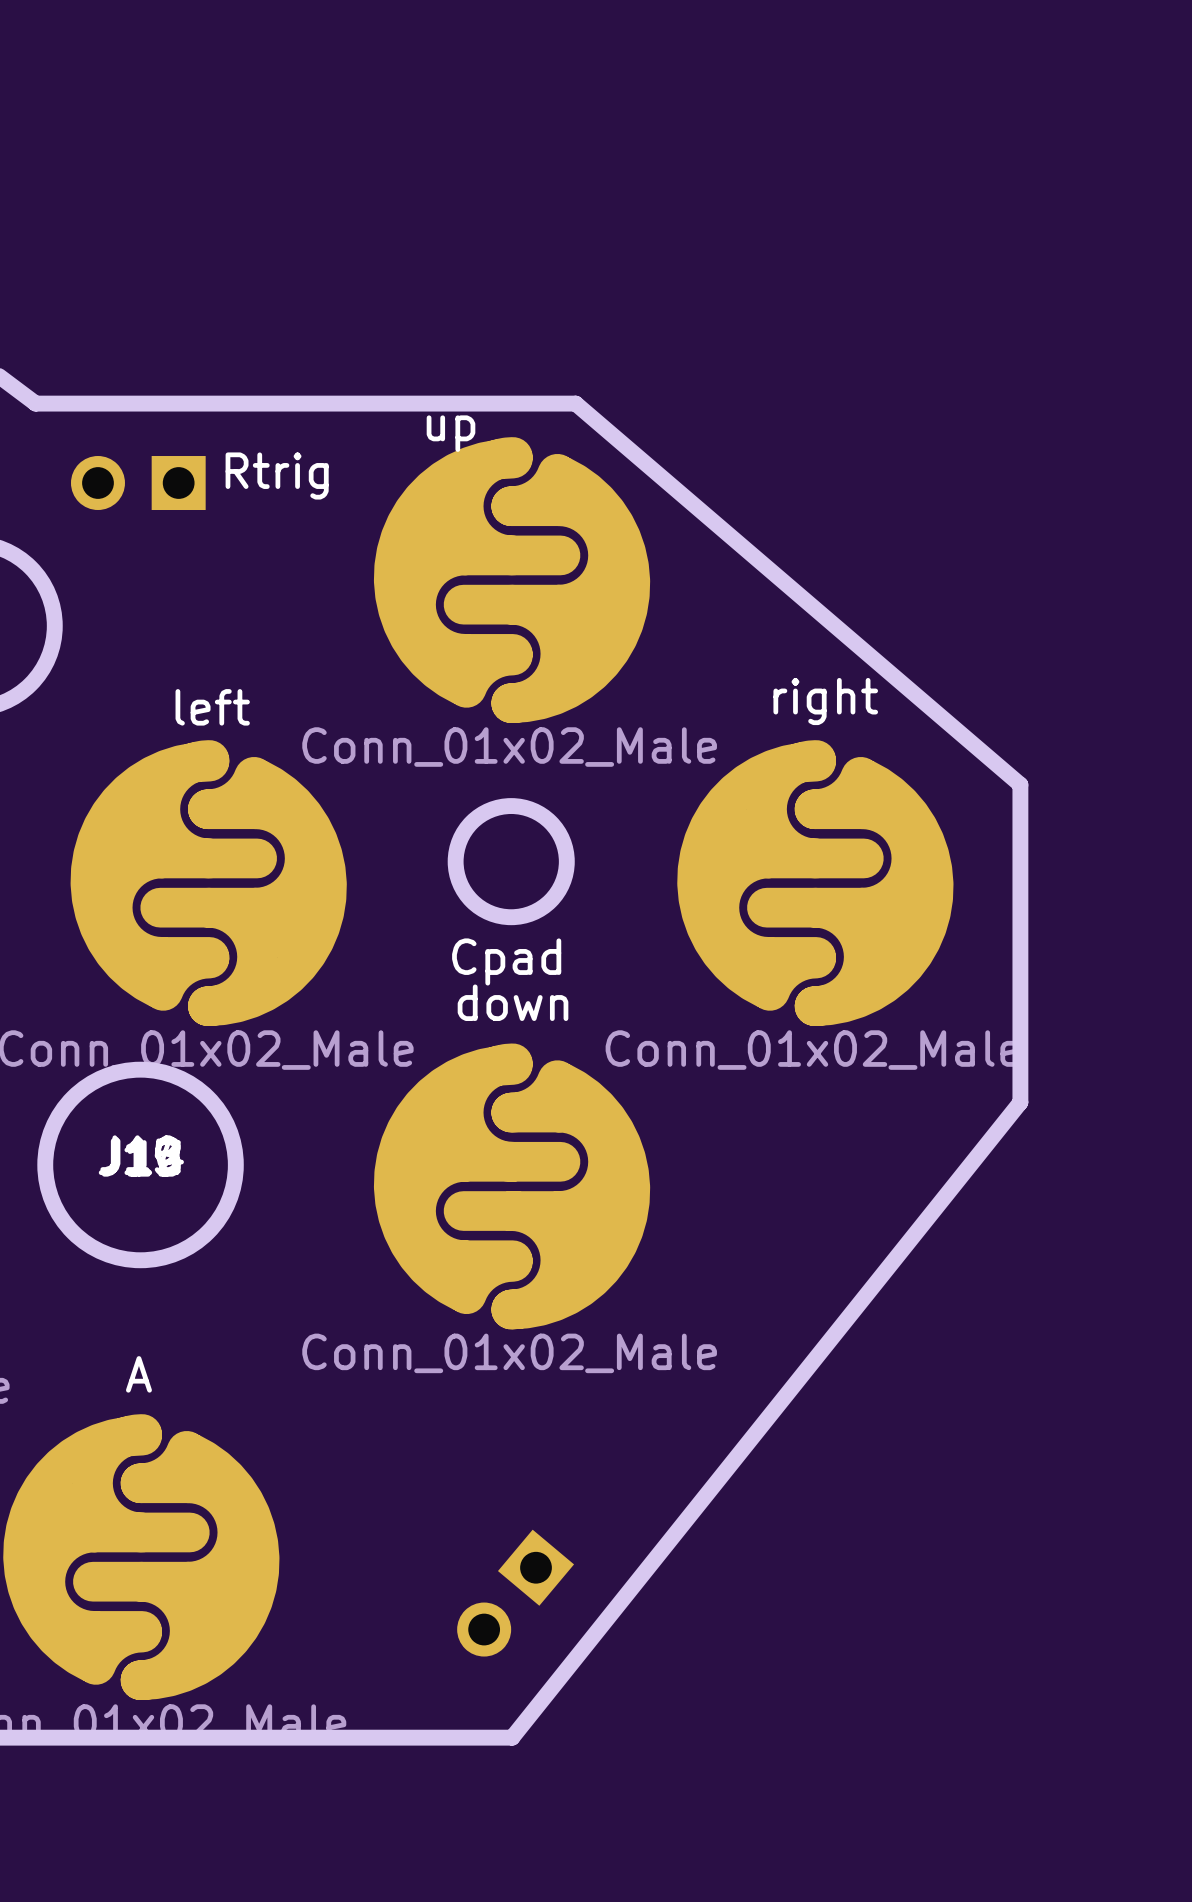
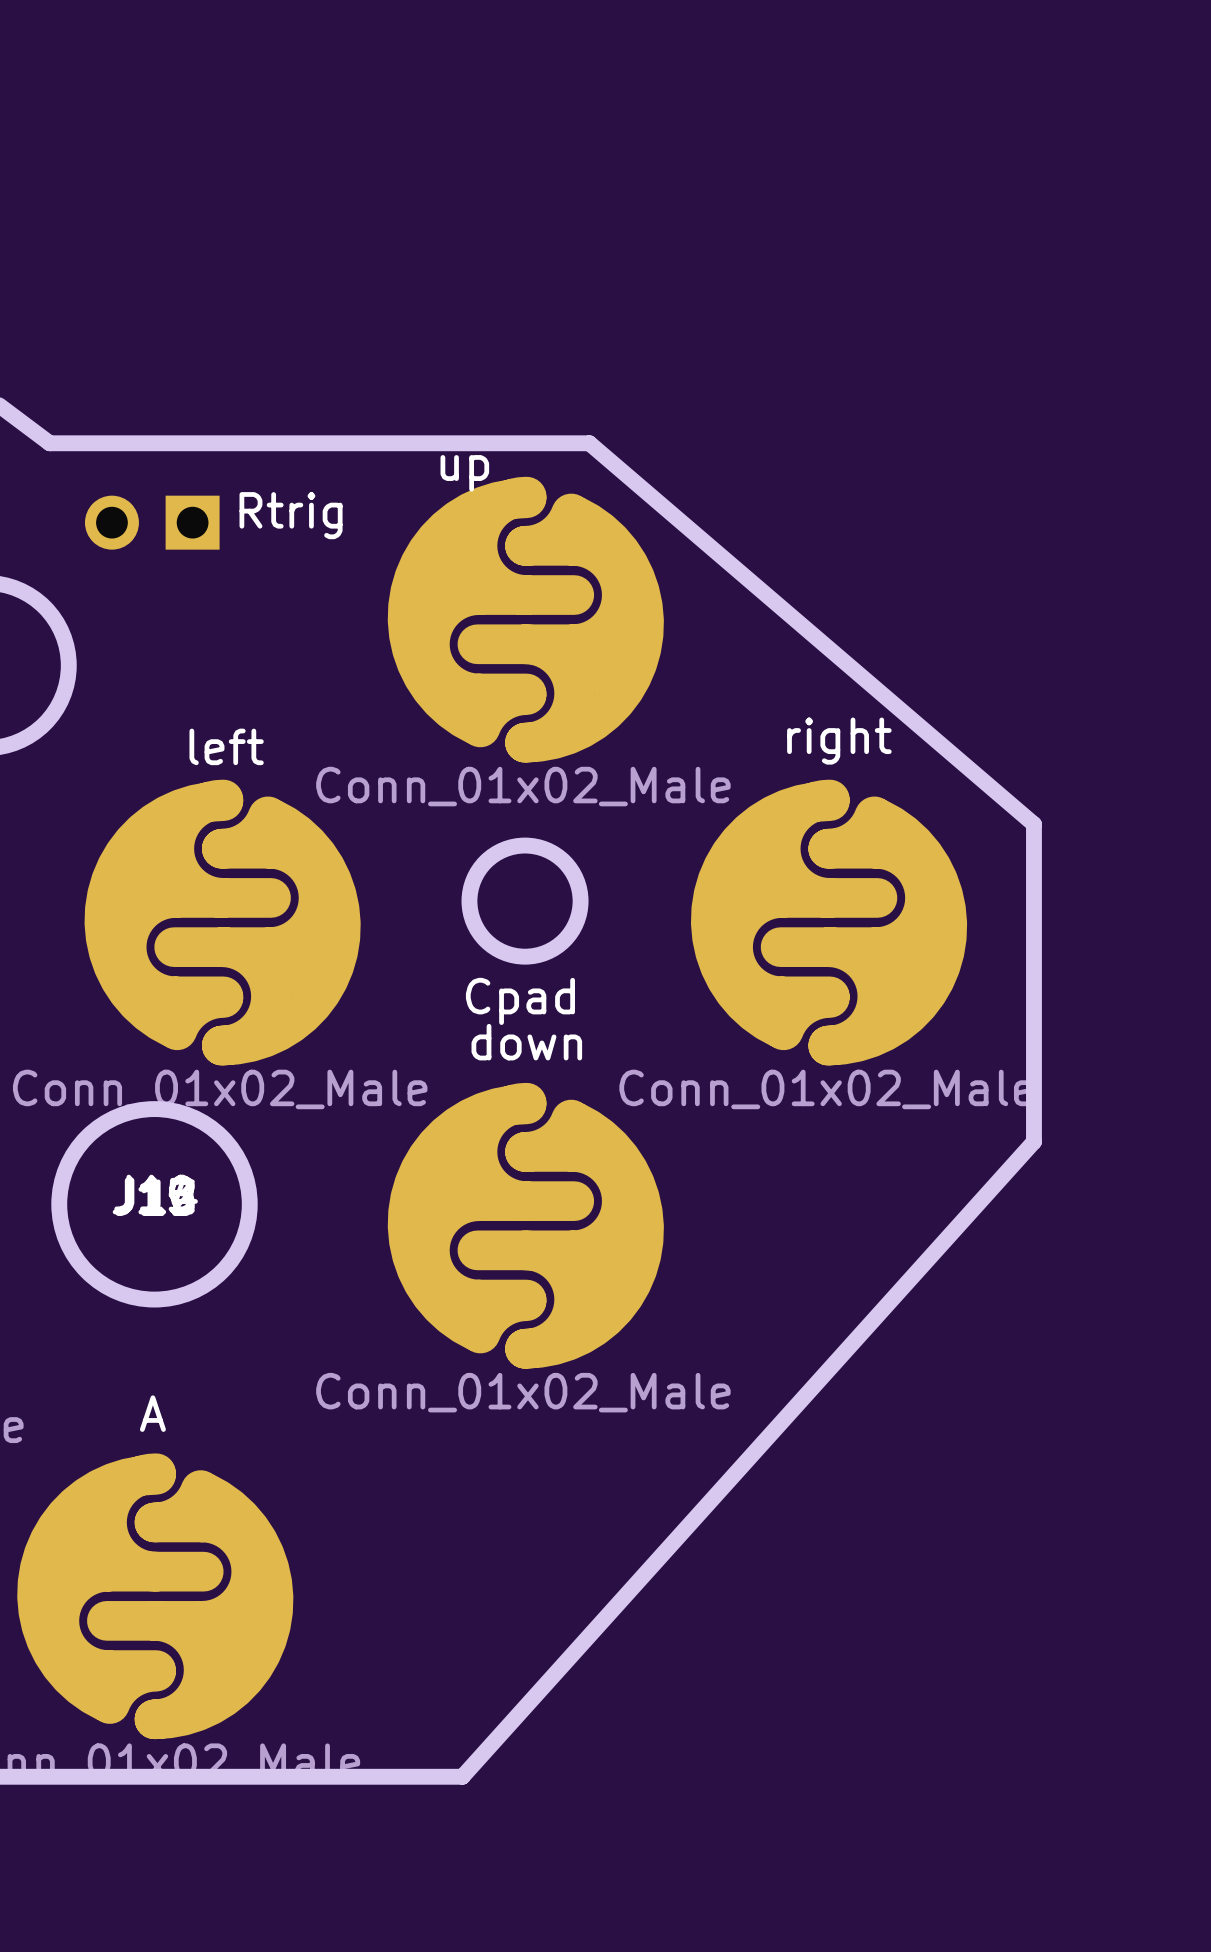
board edge: (1020, 1102) (512, 1737) (448, 1737) -> (1033, 1141) (462, 1776)
part: (515, 1593) -> none

